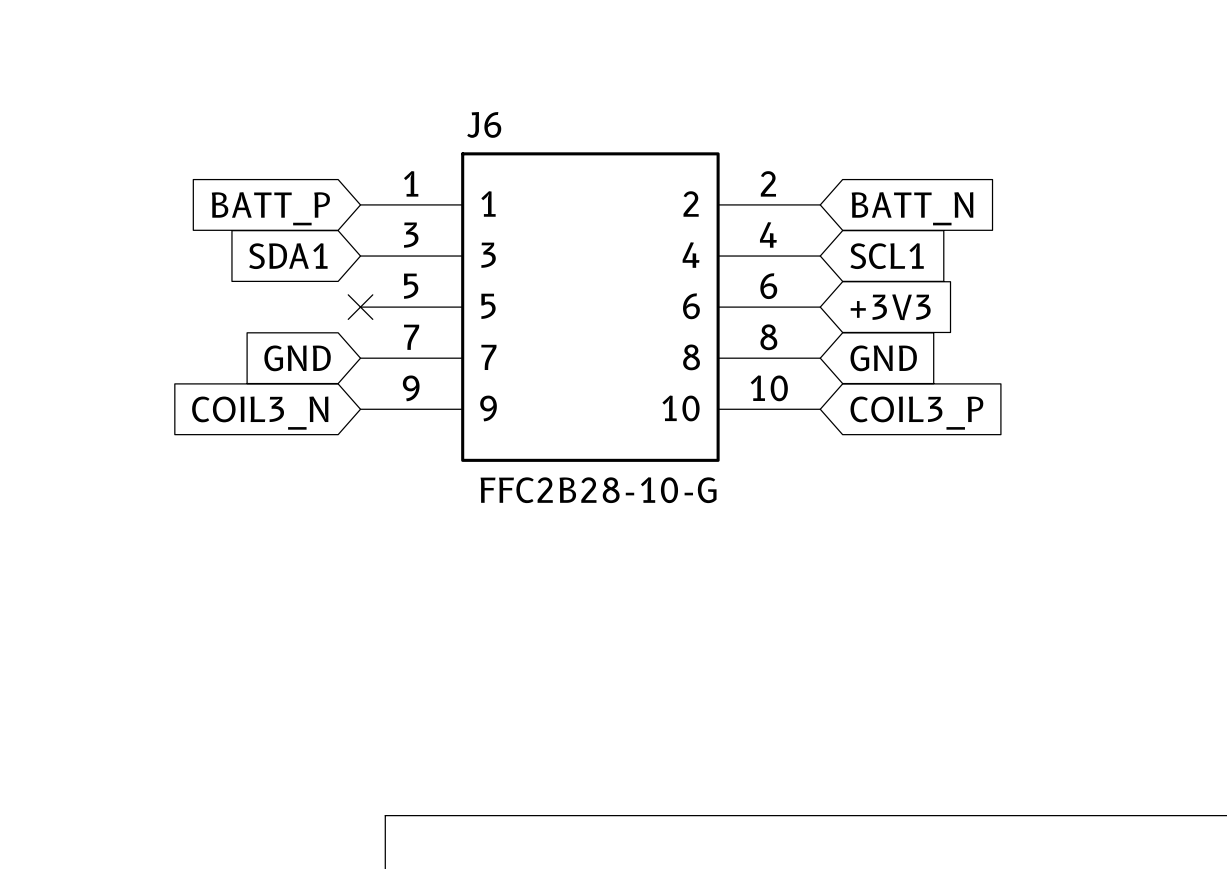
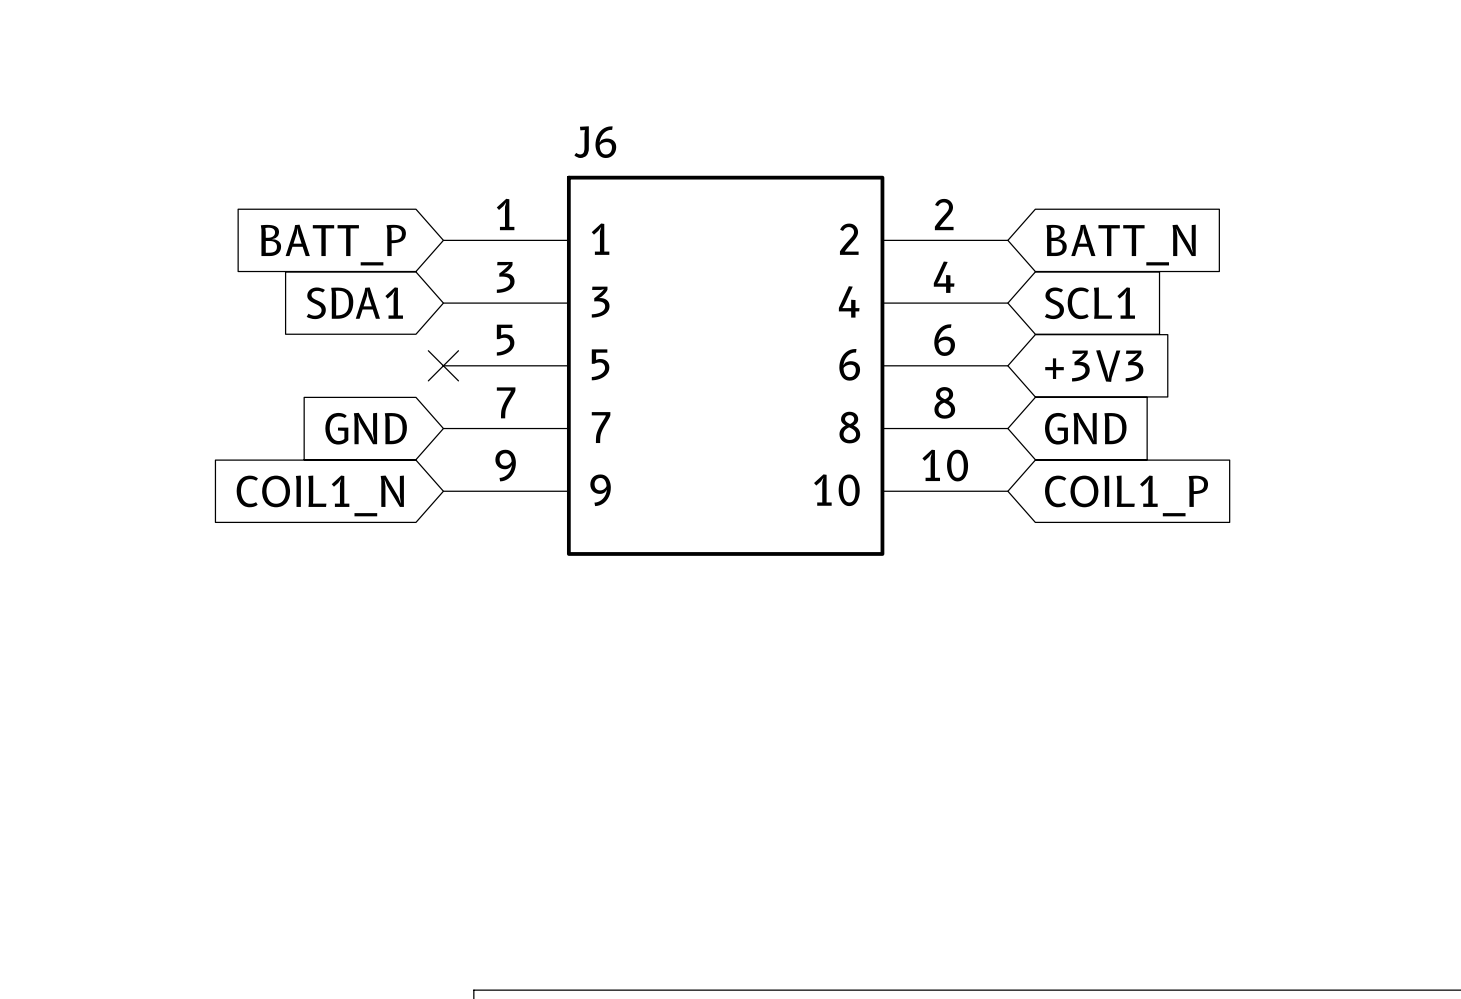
global label: COIL3_N (260, 413) -> COIL1_N (320, 495)
global label: COIL3_P (916, 413) -> COIL1_P (1126, 495)
J6 value: FFC2B28-10-G (598, 490) -> none

